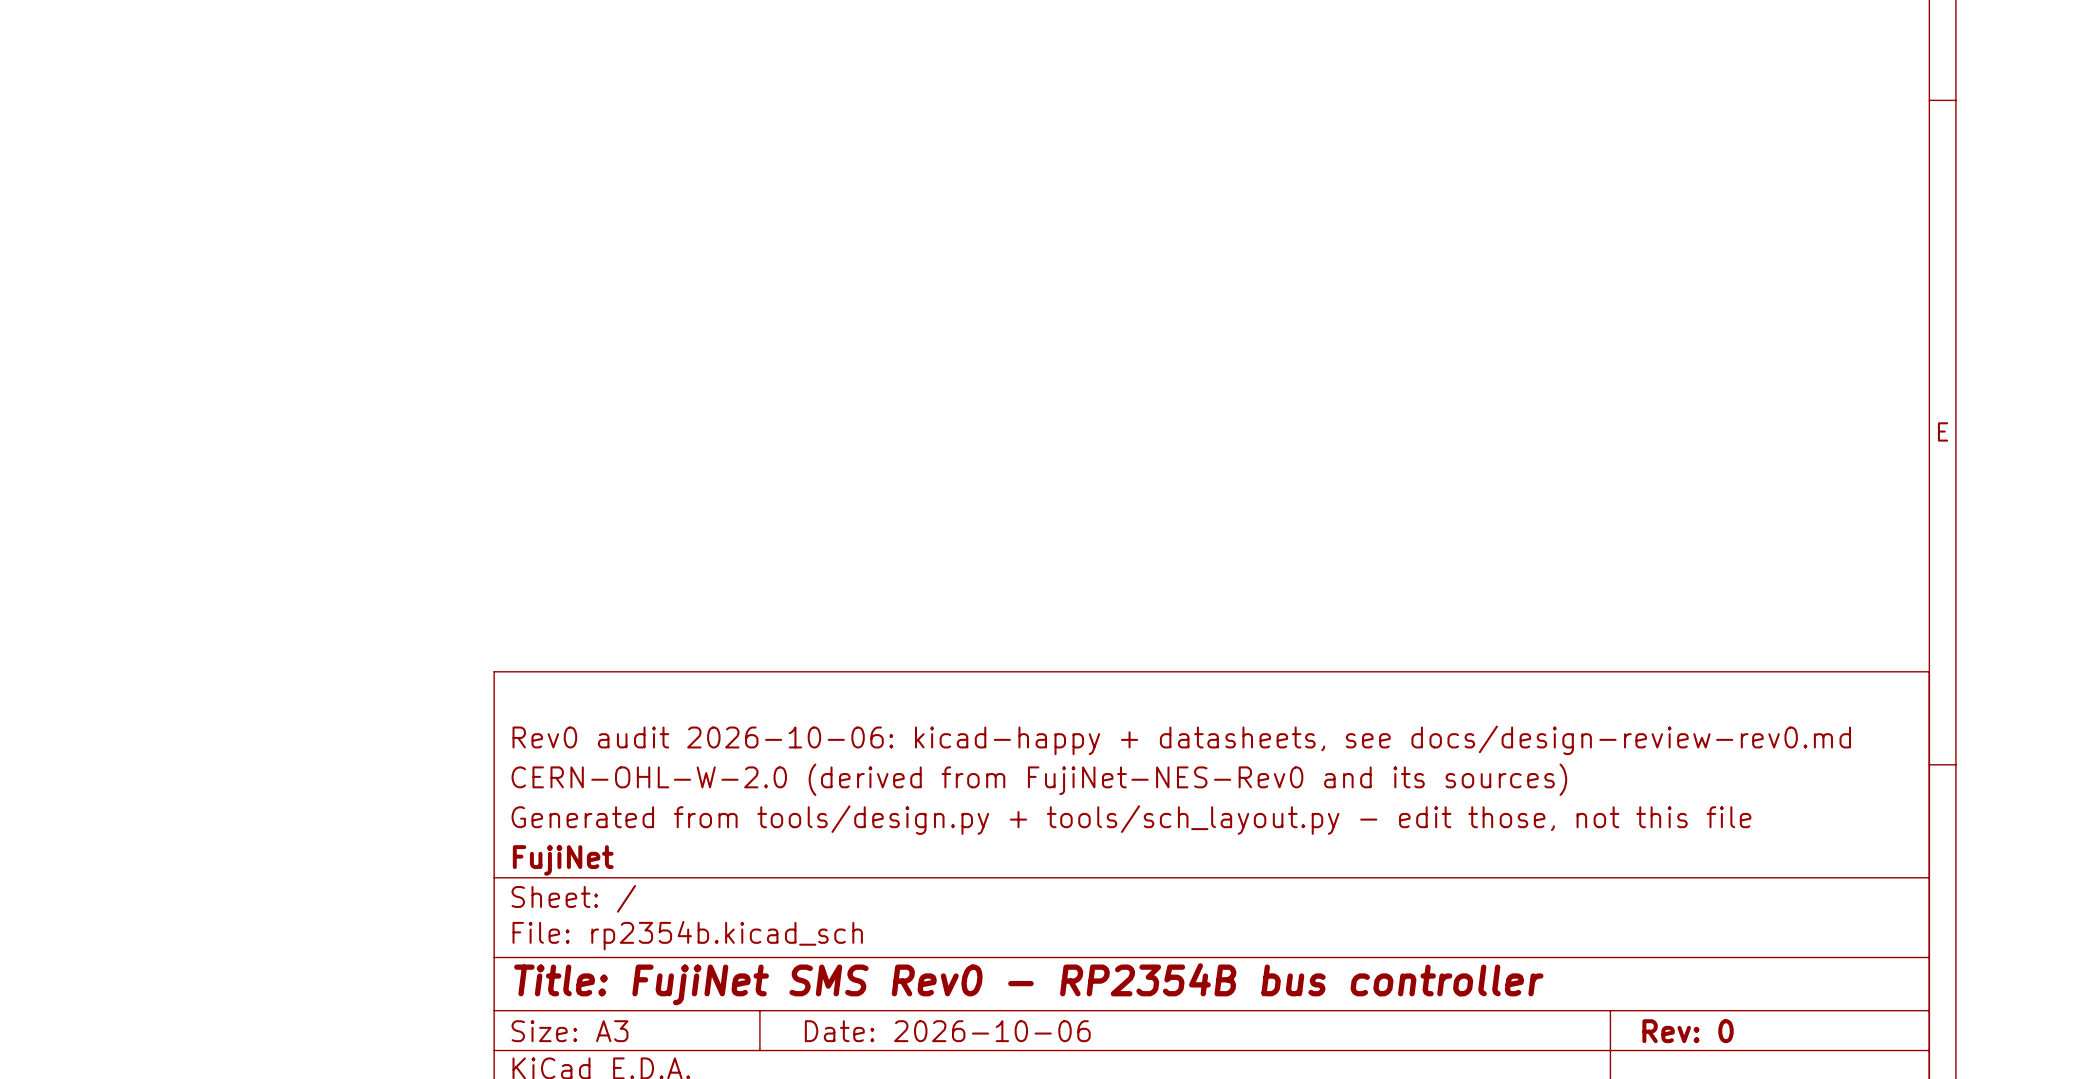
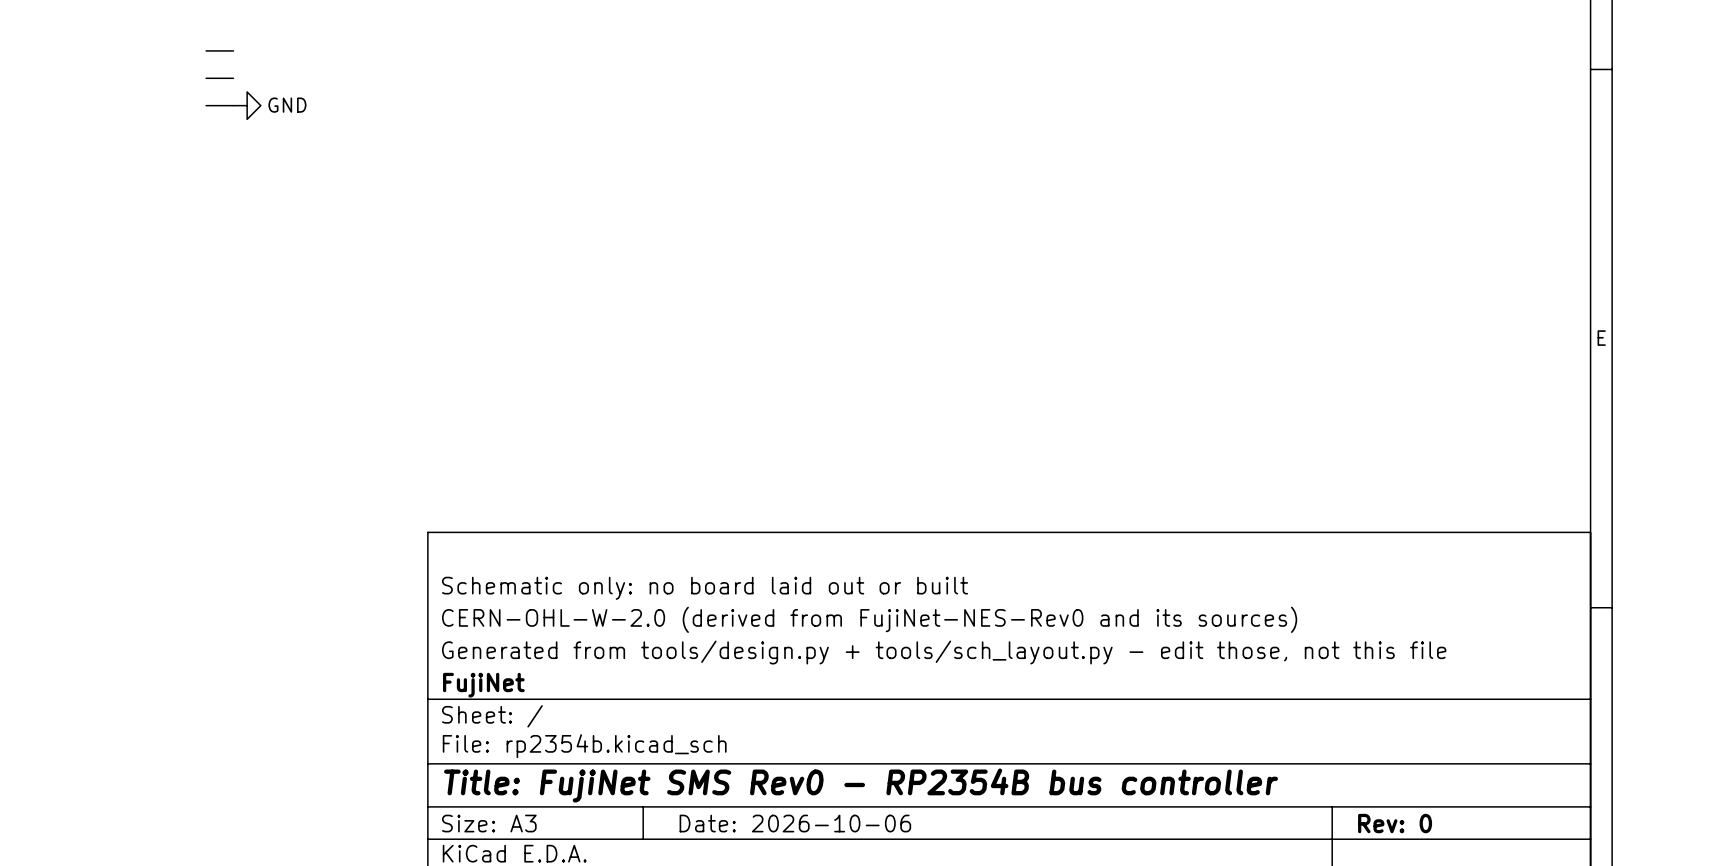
wire: none -> (206, 50) (233, 50)
wire: none -> (206, 78) (233, 78)
wire: none -> (206, 105) (233, 105)
power symbol: none -> GND (247, 105)
title block: Rev0 audit 2026-10-06: kicad-happy + datasheets, see docs/design-review-rev0.md (1181, 740) -> Schematic only: no board laid out or built (705, 588)

